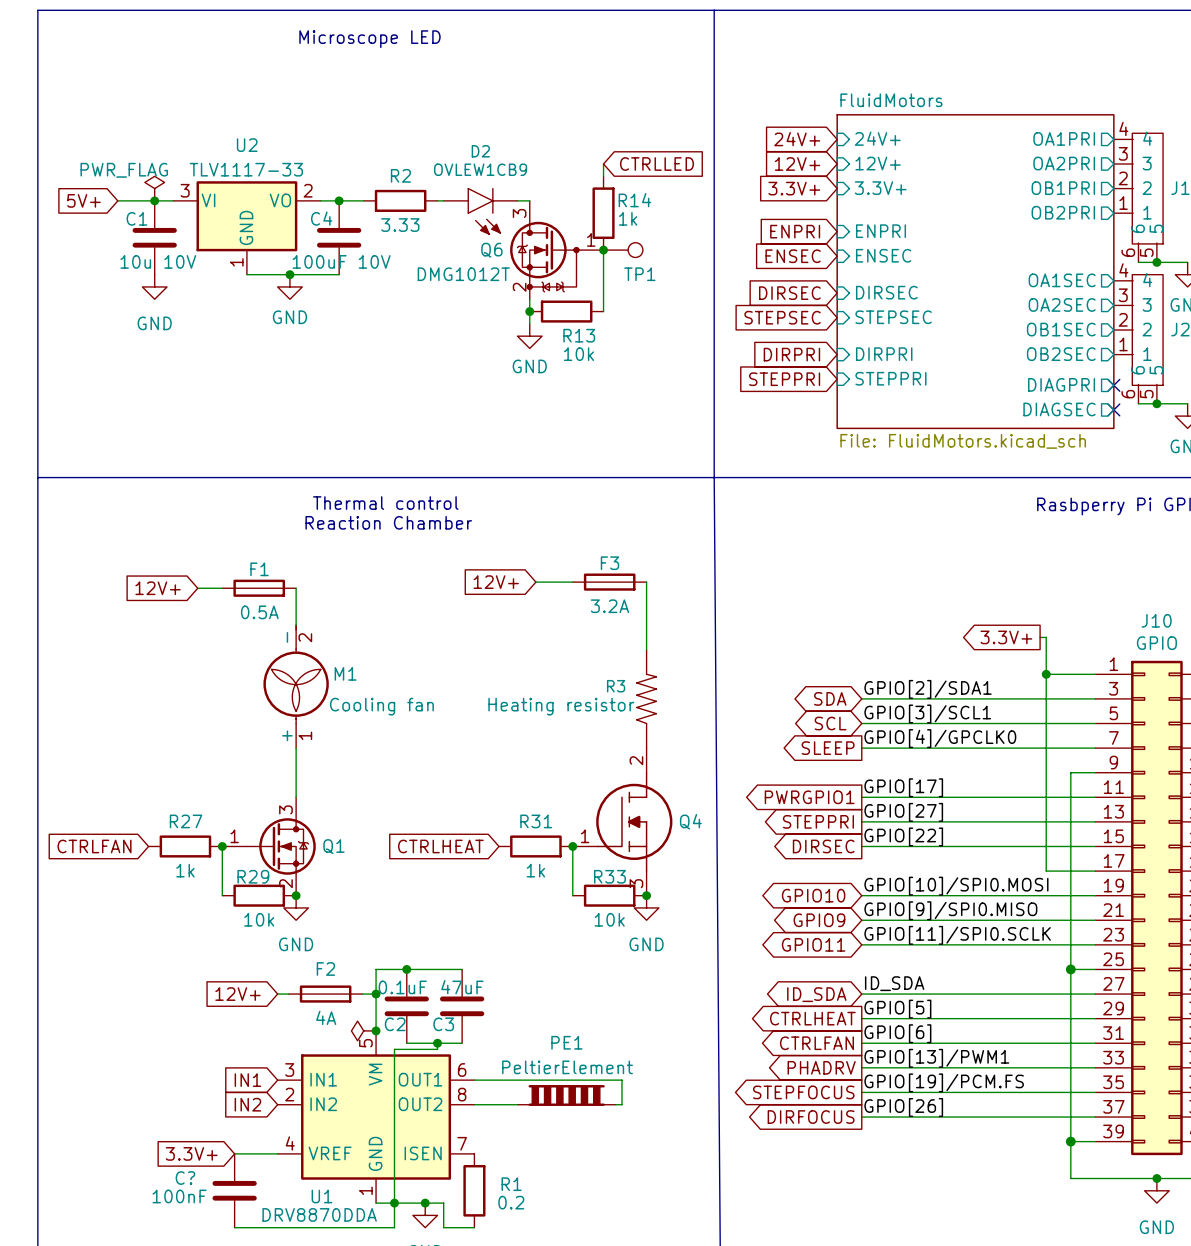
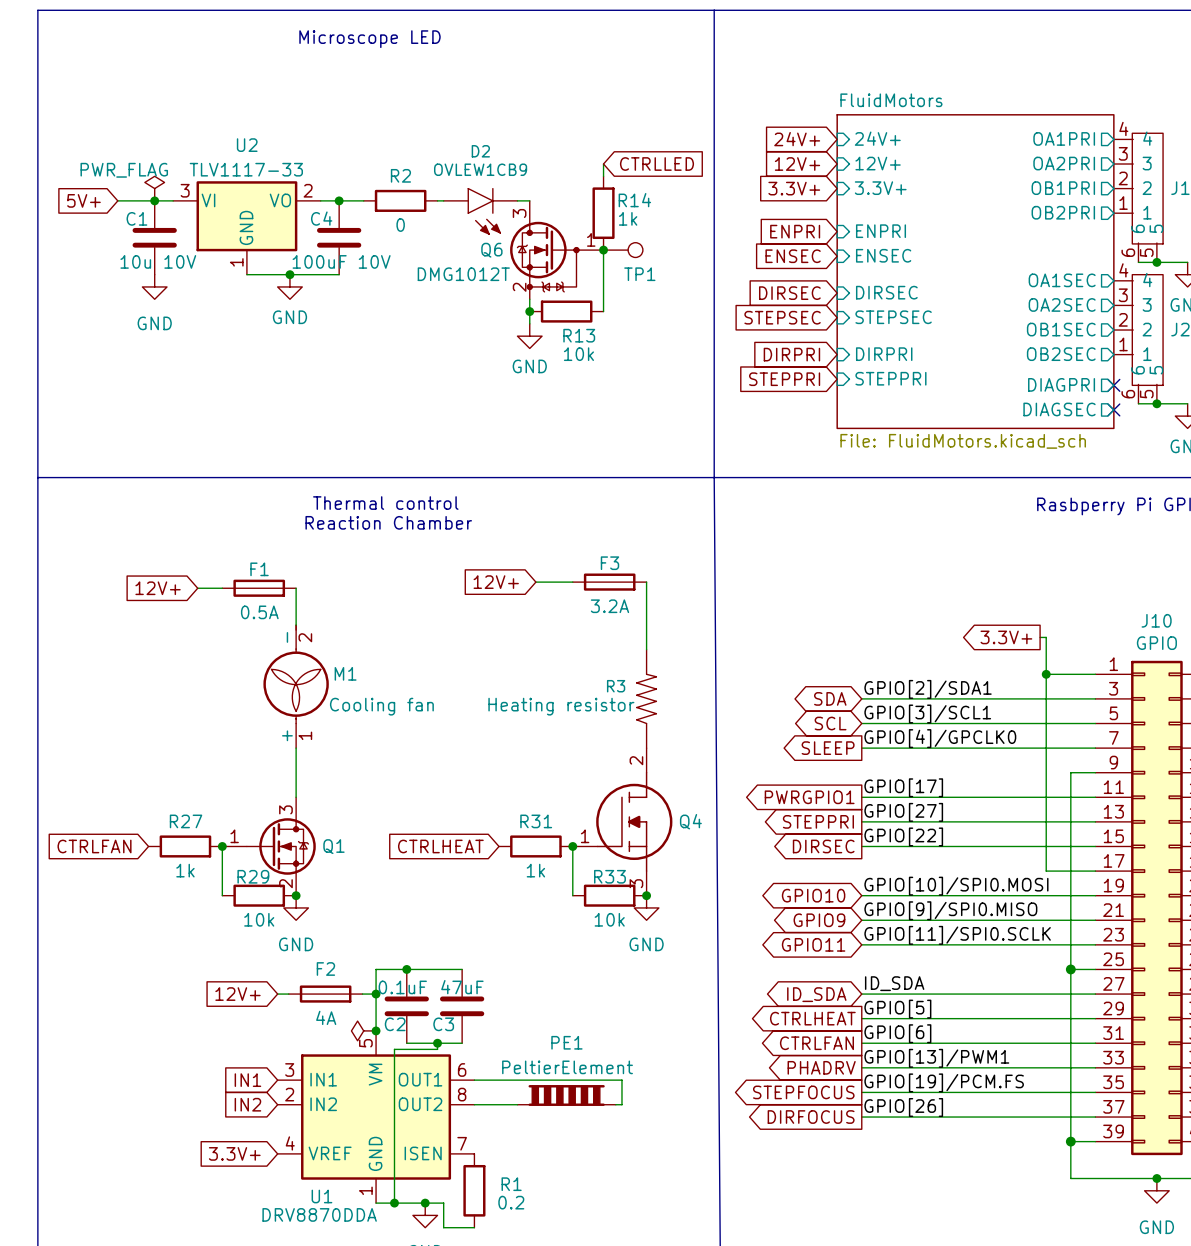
R2 value: 3.33 (400, 225) -> 0 (400, 225)
global label position: 3.3V+ (191, 1153) -> 3.3V+ (234, 1153)
wire: (234, 1153) (277, 1153) -> none
C?: 100nF (234, 1190) -> none
wire: (394, 1203) (394, 1227) (234, 1227) -> none

